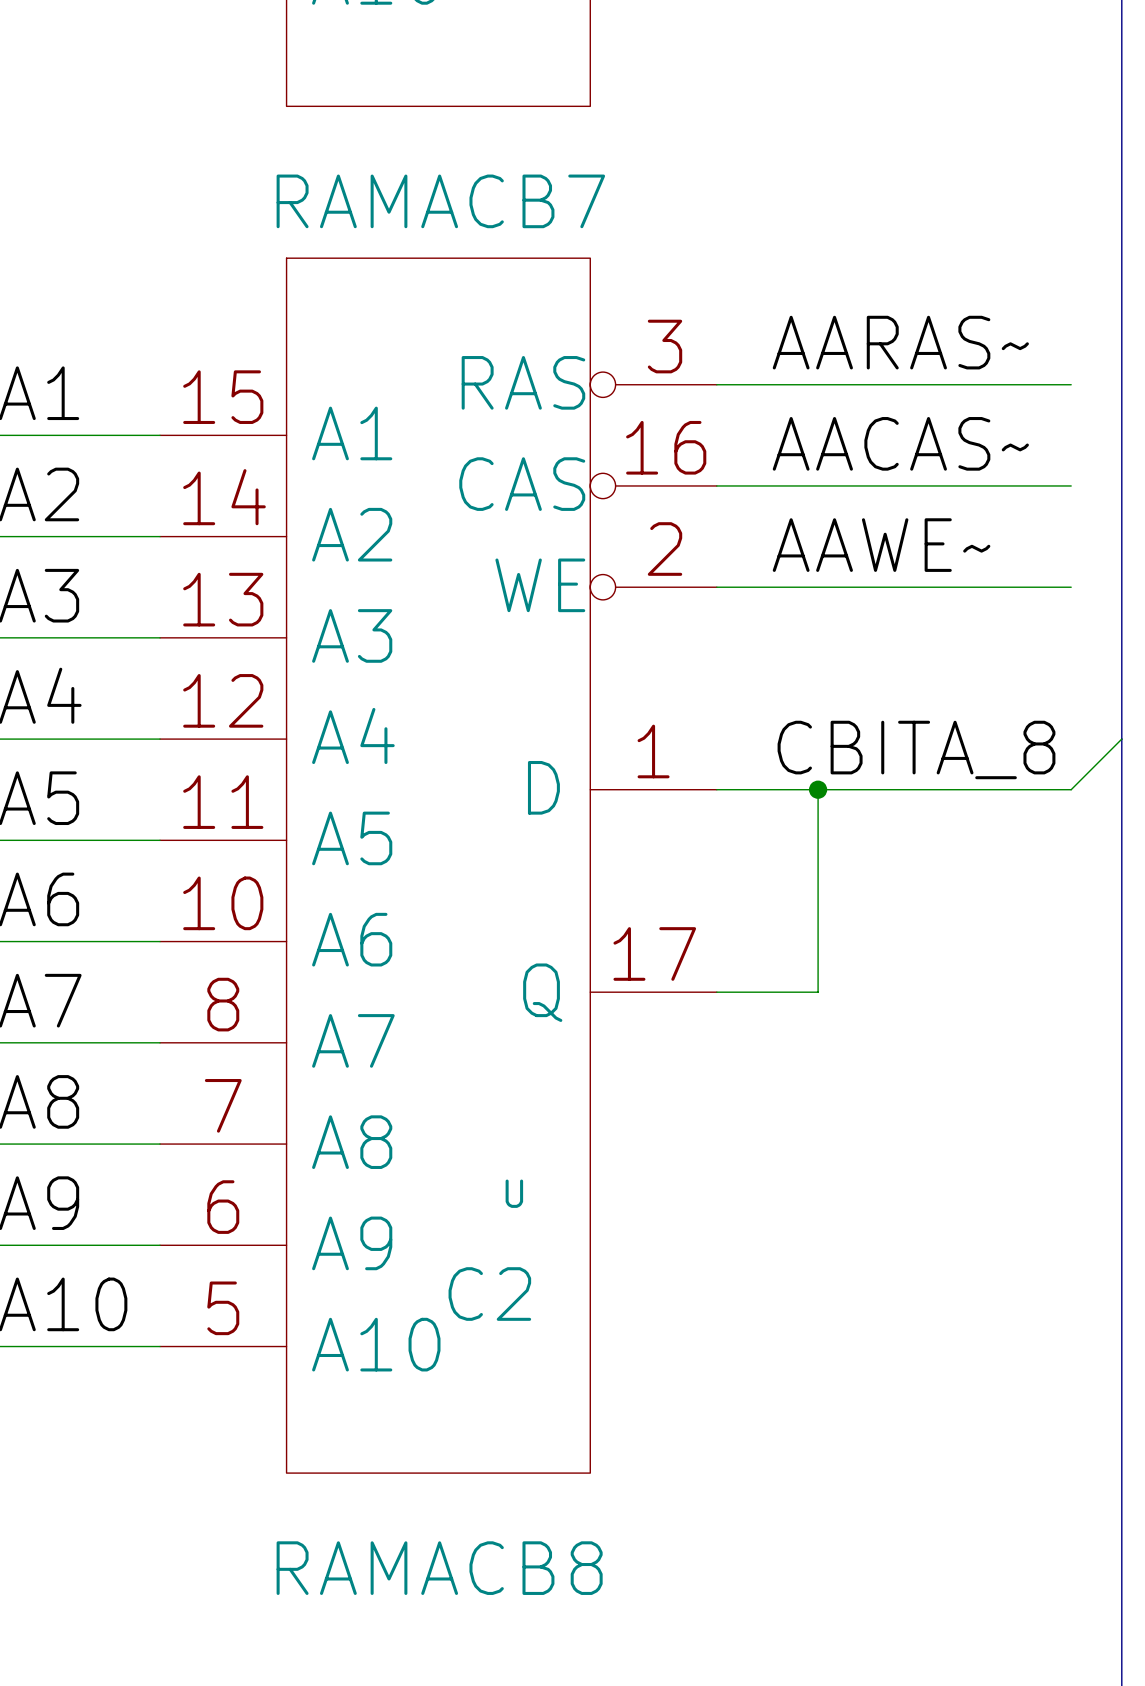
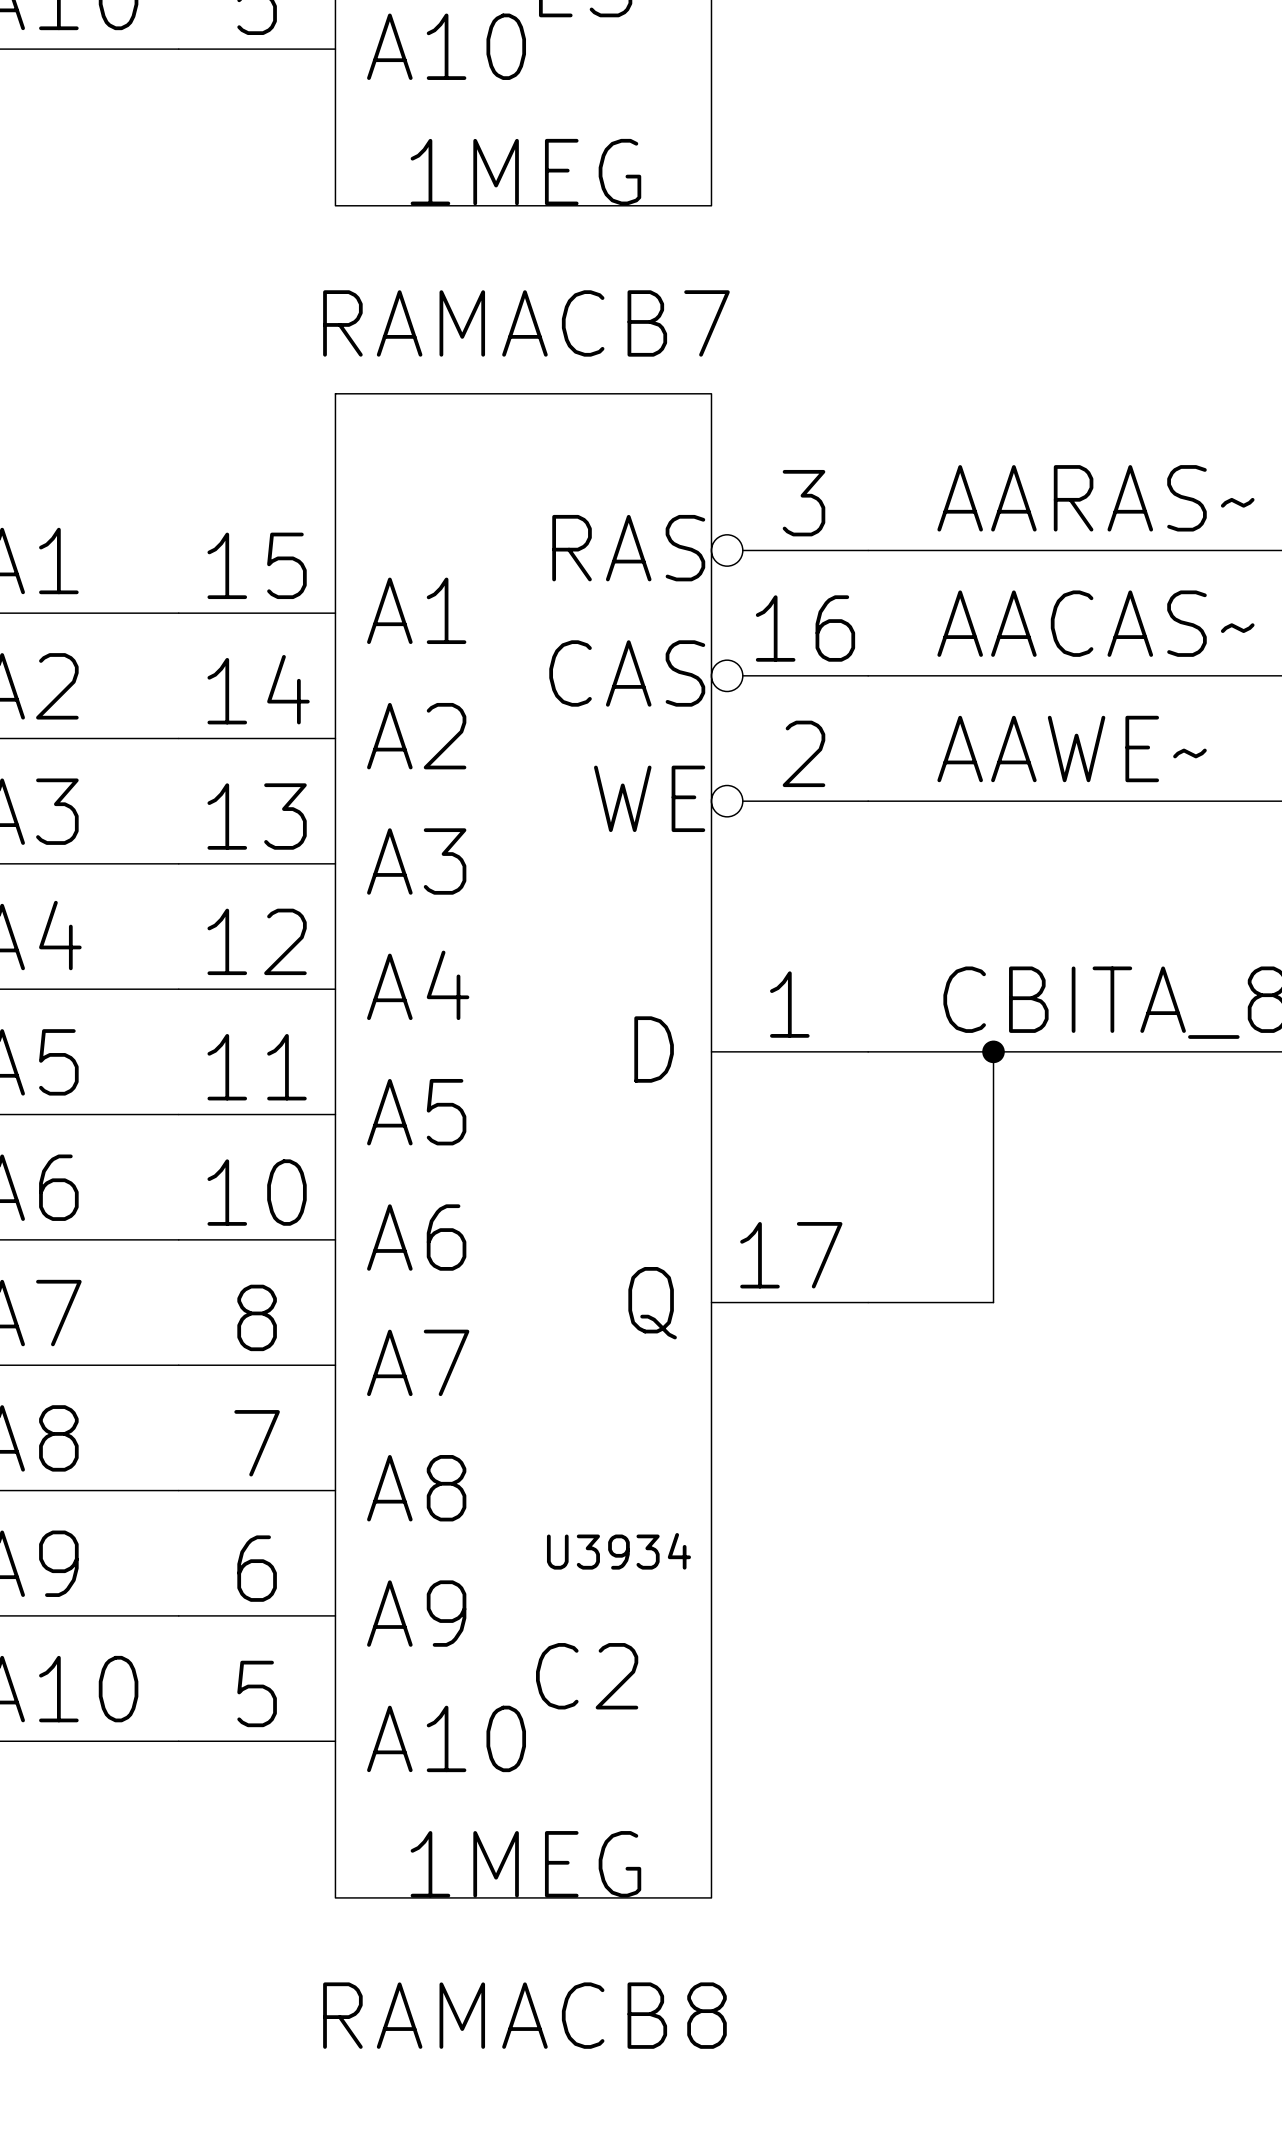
part value: none -> 1MEG (525, 172)
U name: U (514, 1193) -> U3934 (618, 1551)
U value: none -> 1MEG (525, 1864)

